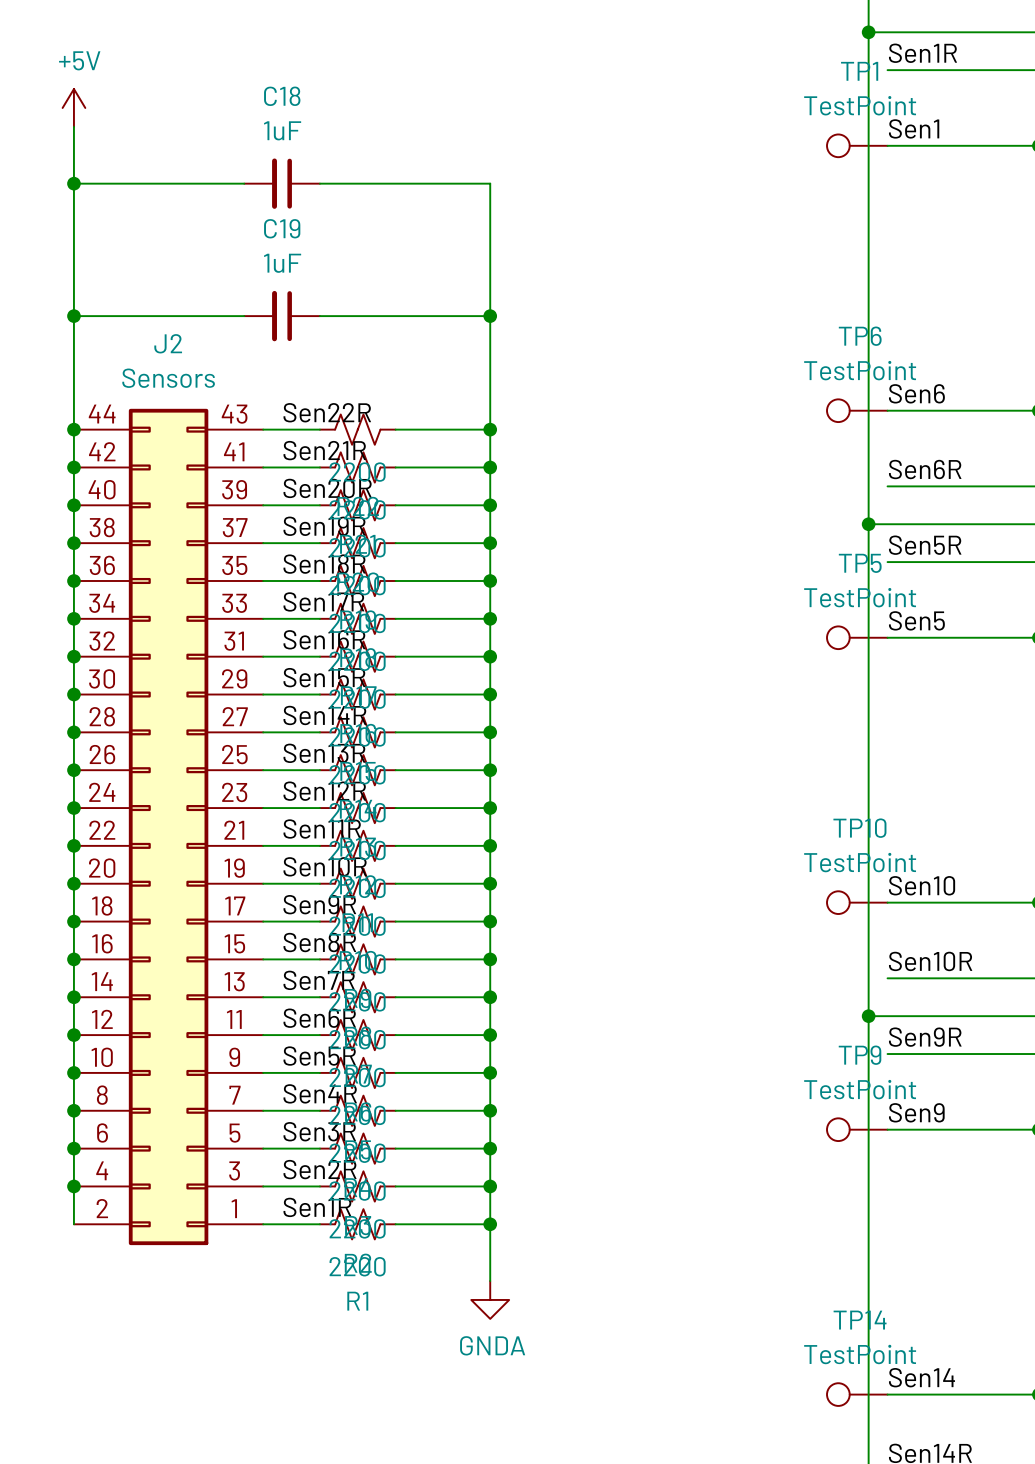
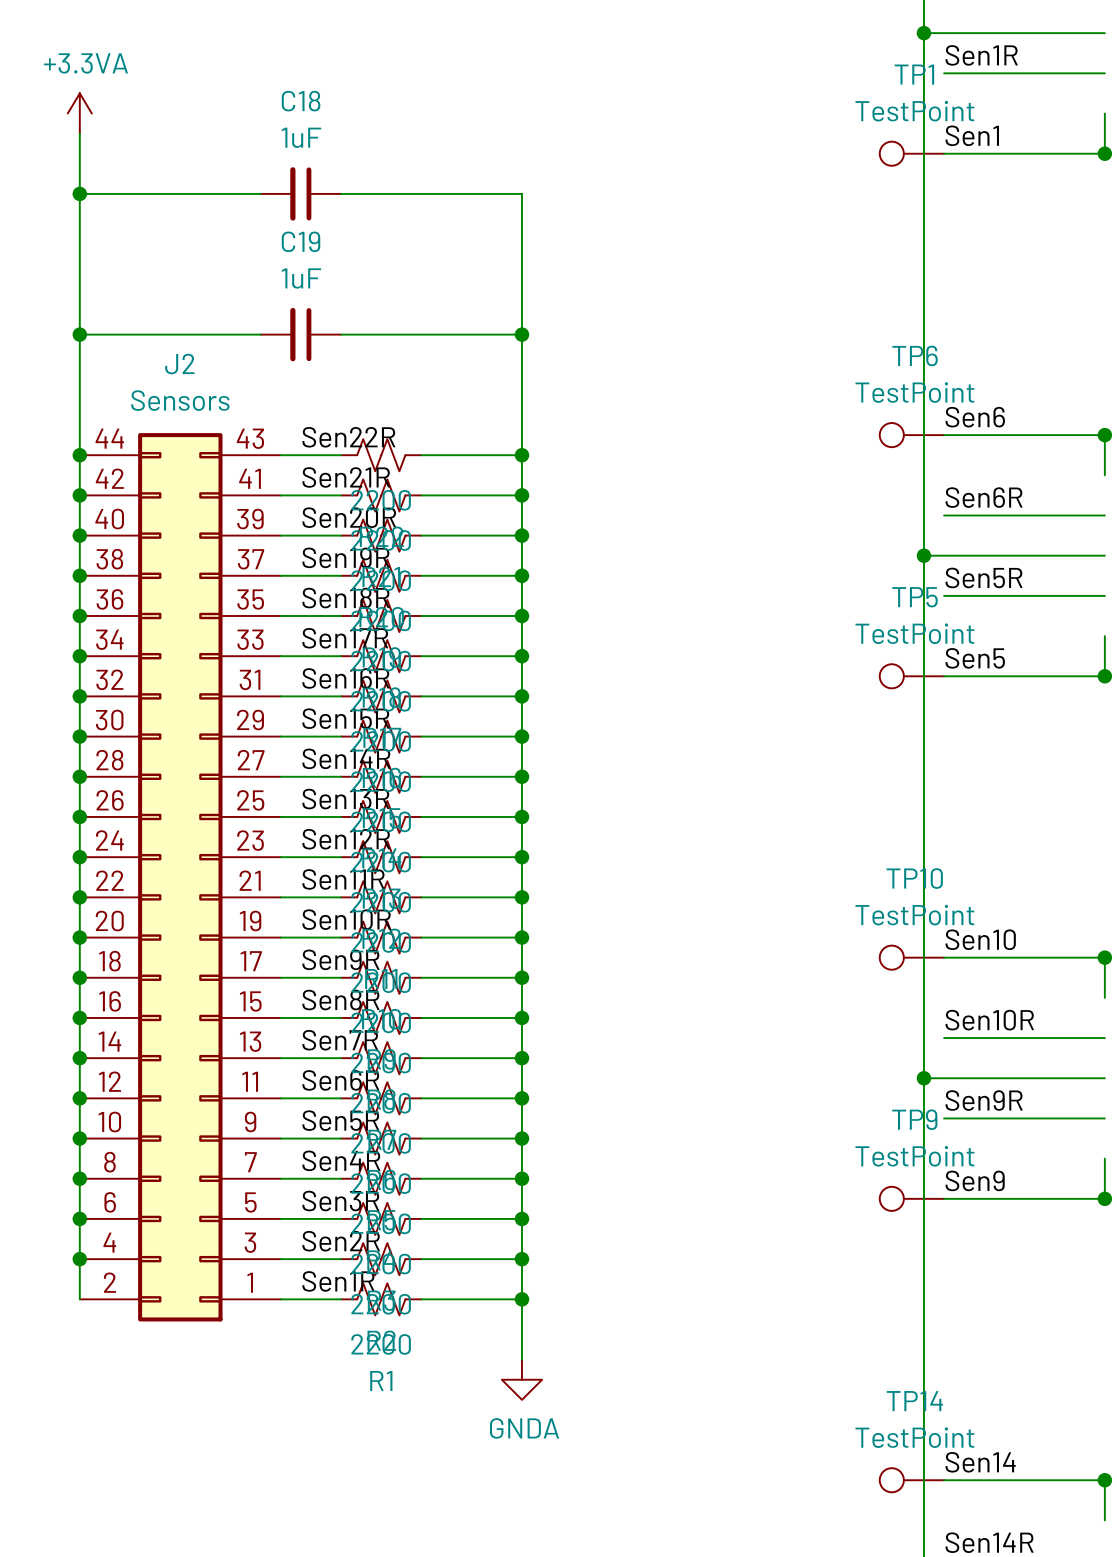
power symbol: +5V (73, 107) -> +3.3VA (79, 113)

